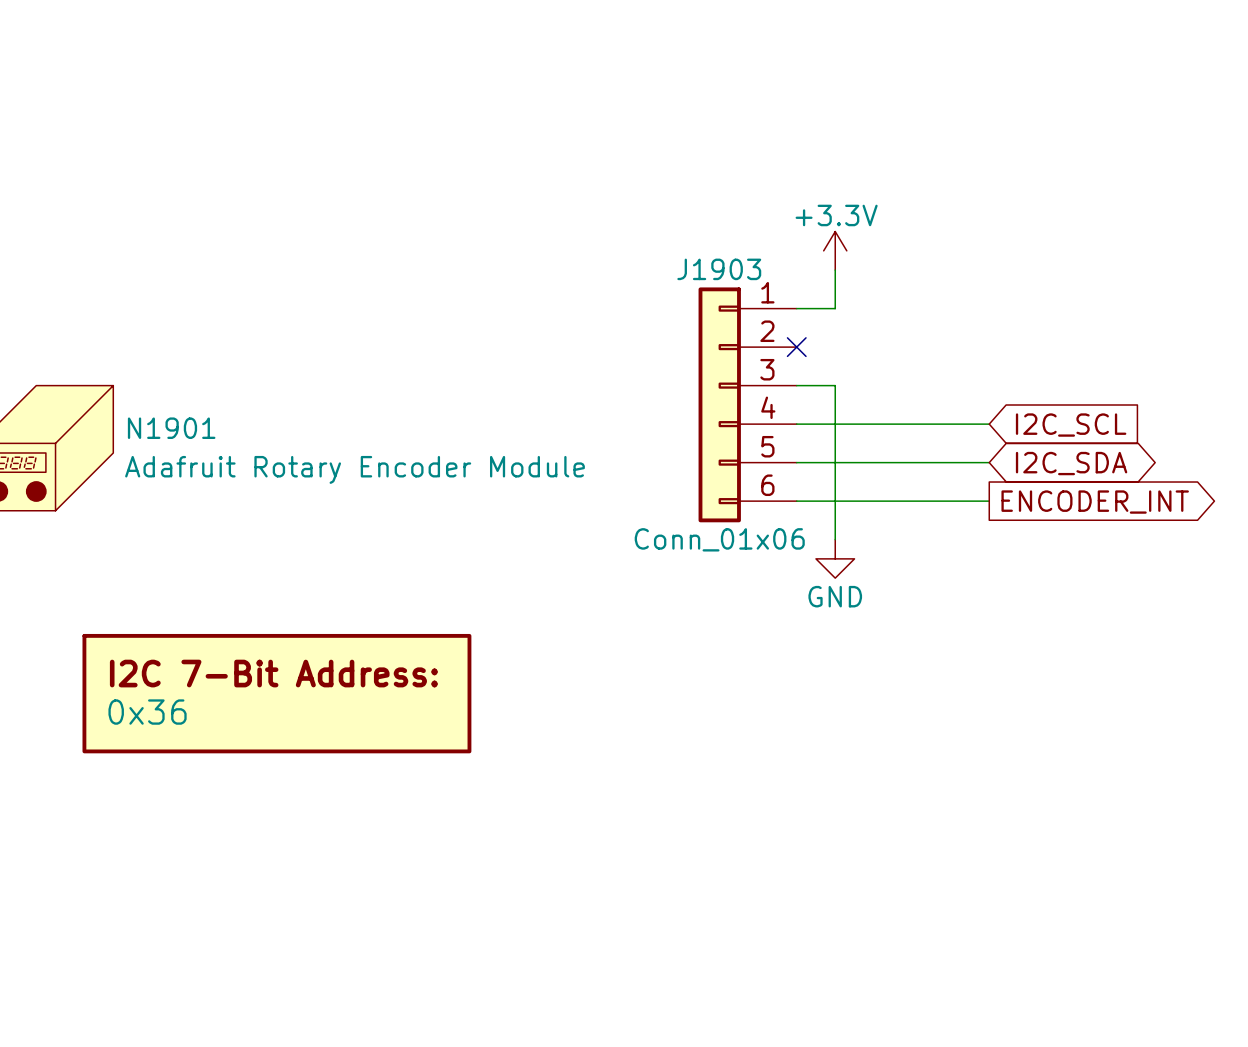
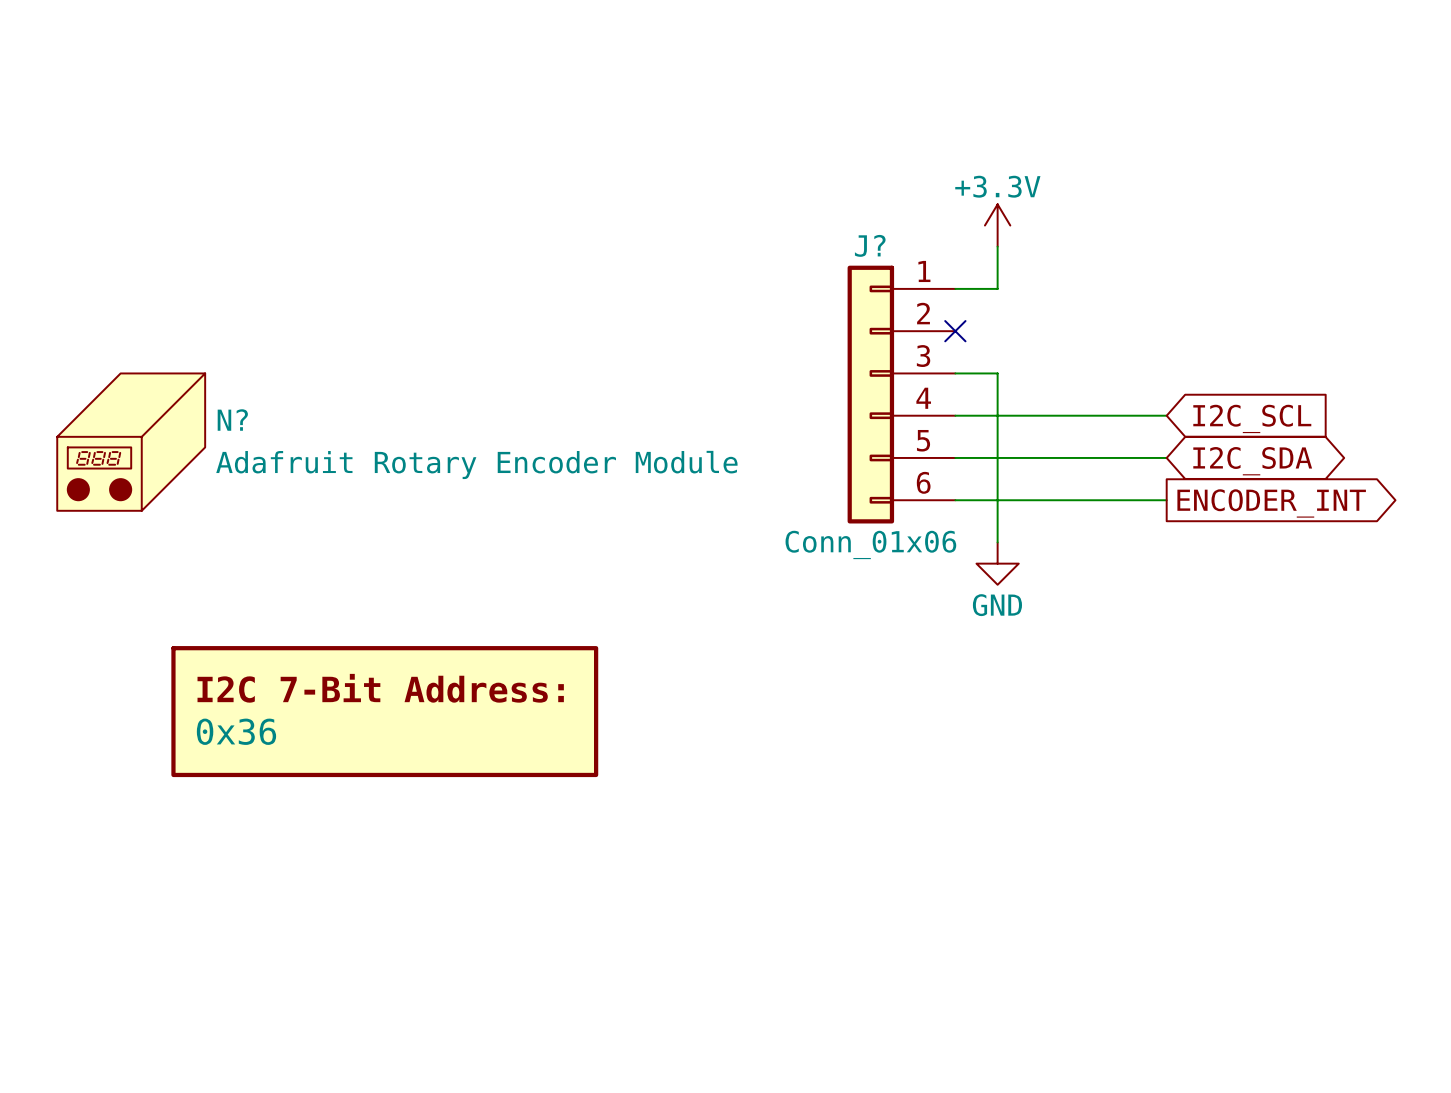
J1903 name: J1903 (719, 269) -> J? (870, 245)
N1901 name: N1901 (171, 428) -> N? (232, 420)

